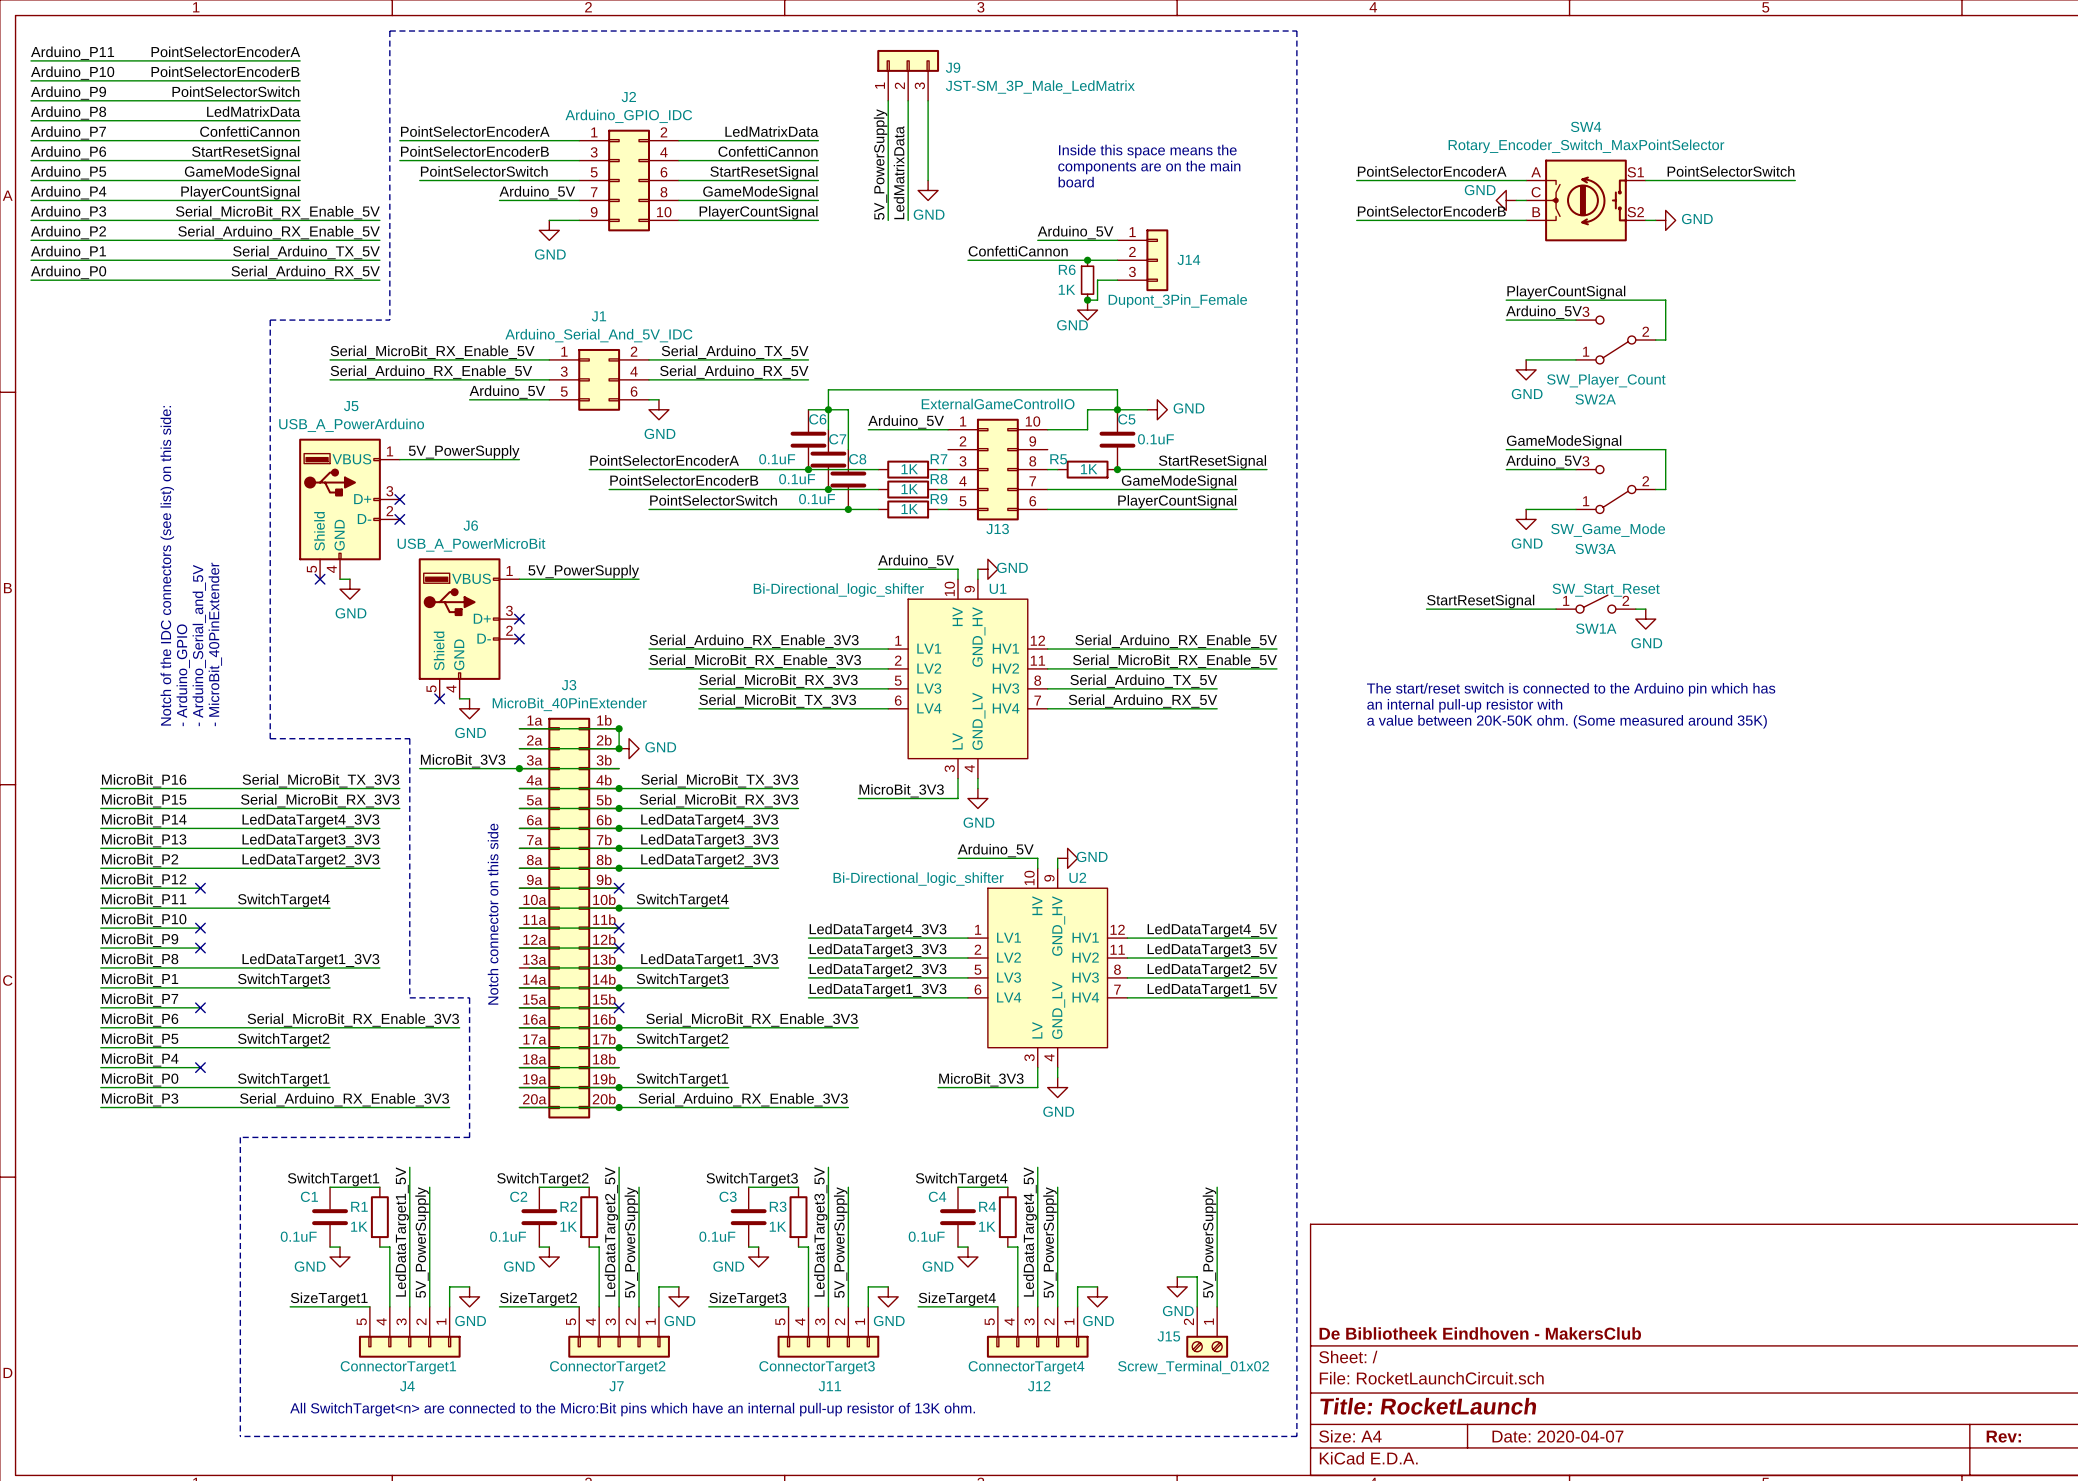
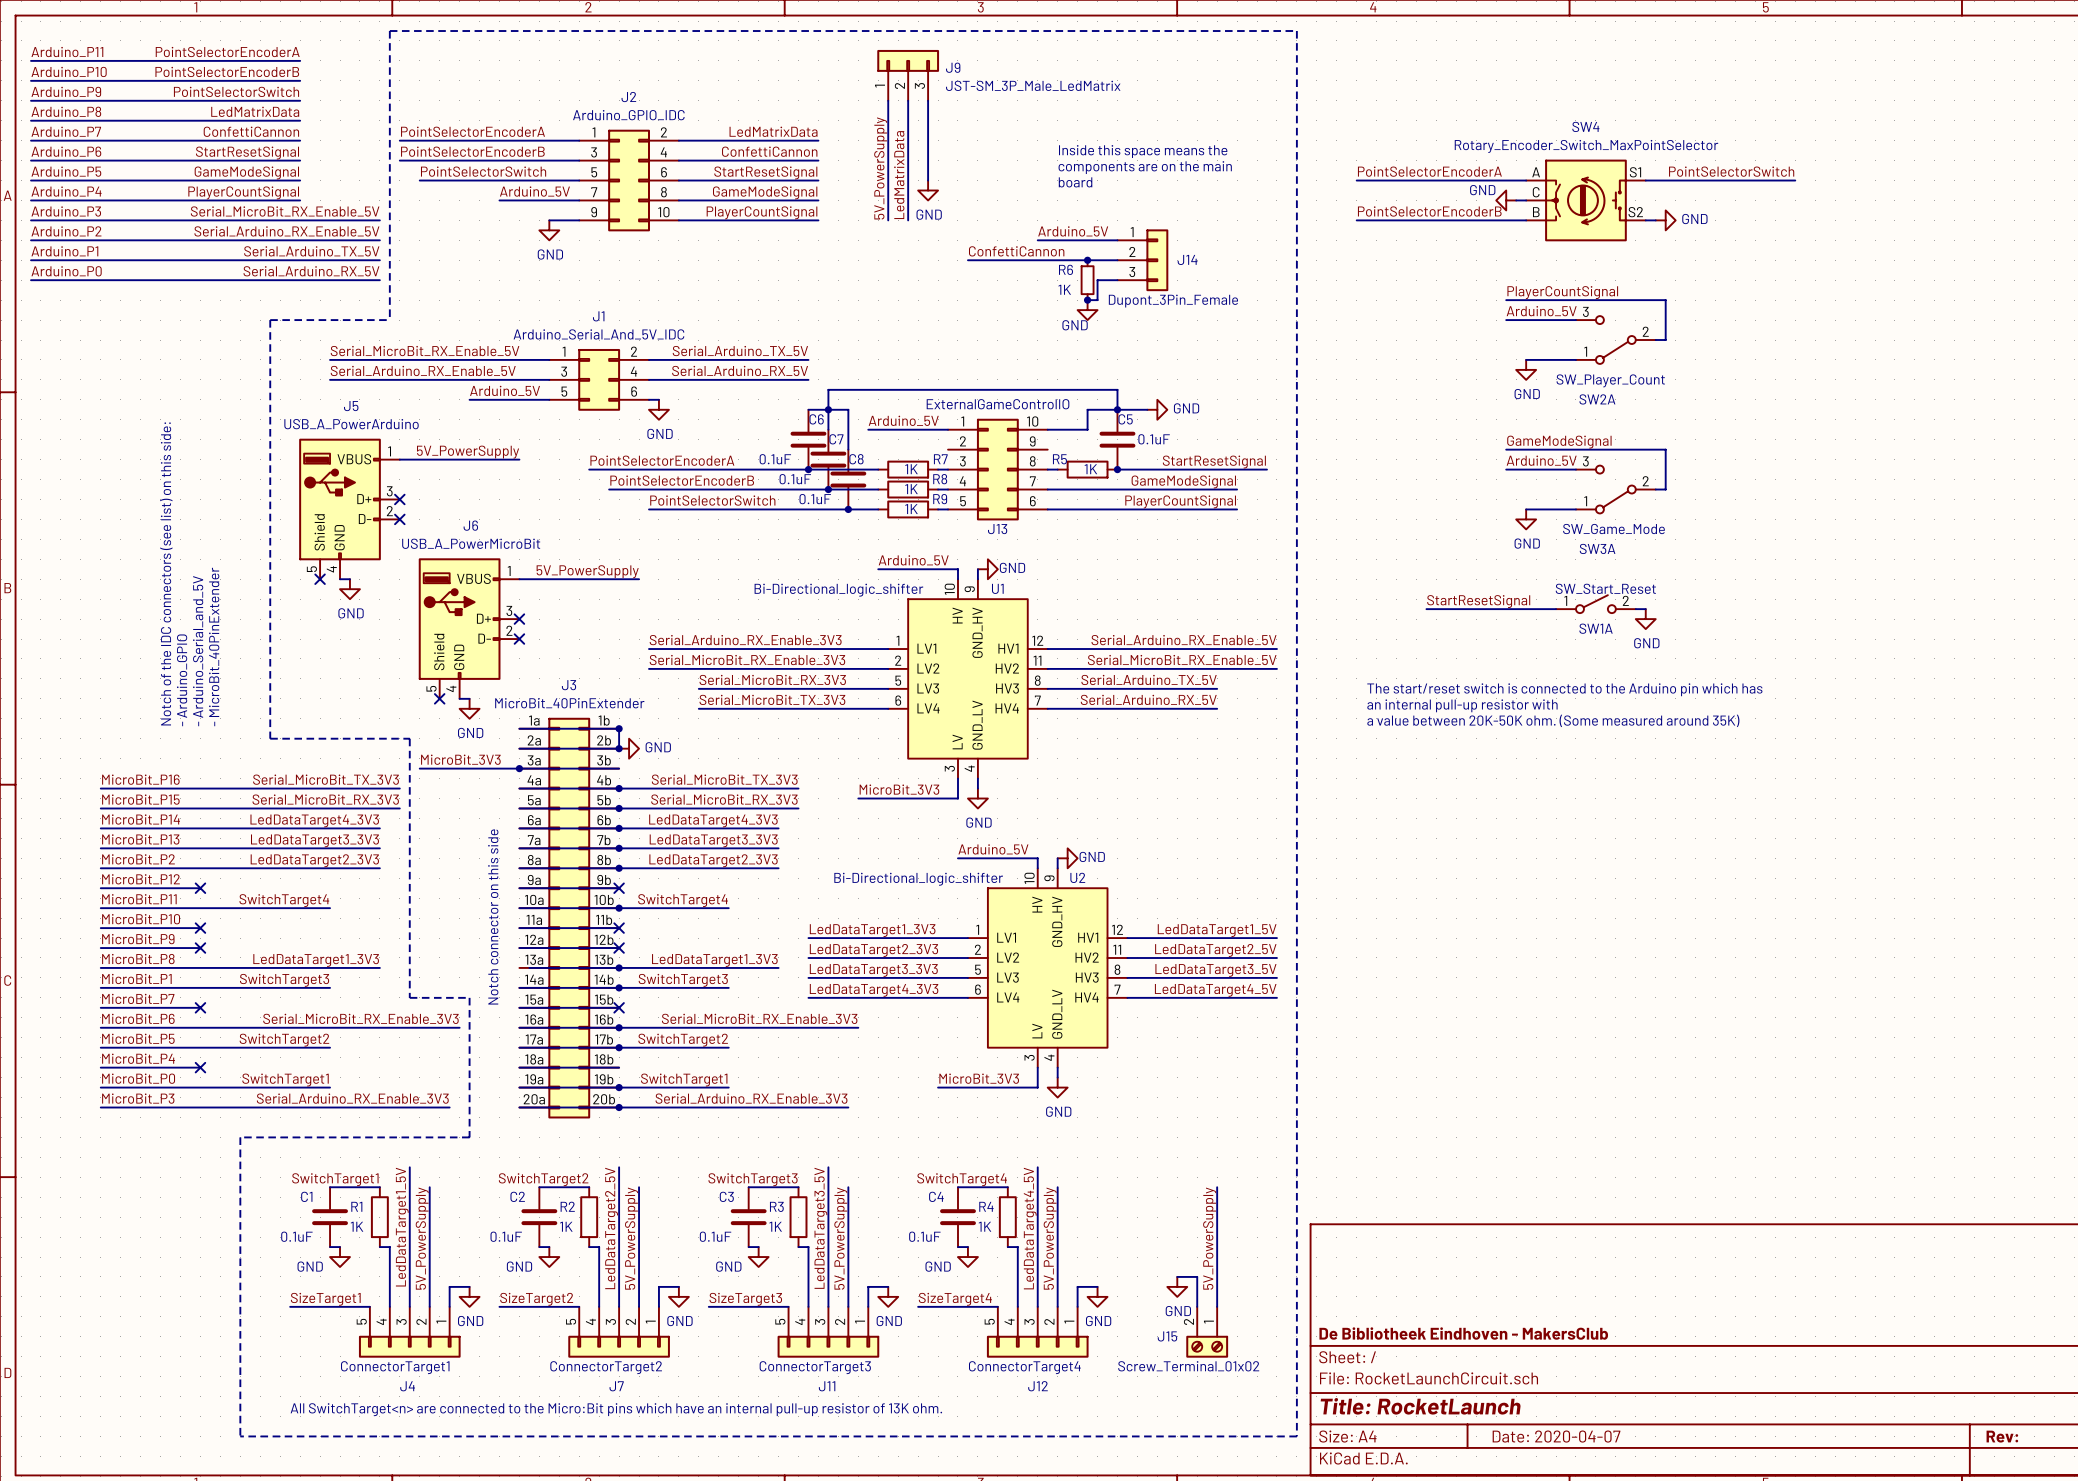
label: LedDataTarget4_3V3 (878, 930) -> LedDataTarget1_3V3 (872, 930)
label: LedDataTarget4_5V (1212, 930) -> LedDataTarget1_5V (1217, 930)
label: LedDataTarget3_3V3 (878, 950) -> LedDataTarget2_3V3 (873, 950)
label: LedDataTarget3_5V (1212, 950) -> LedDataTarget2_5V (1215, 950)
label: LedDataTarget2_3V3 (878, 970) -> LedDataTarget3_3V3 (873, 970)
label: LedDataTarget2_5V (1212, 970) -> LedDataTarget3_5V (1215, 970)
label: LedDataTarget1_3V3 (878, 990) -> LedDataTarget4_3V3 (874, 990)
label: LedDataTarget1_5V (1212, 990) -> LedDataTarget4_5V (1215, 990)

